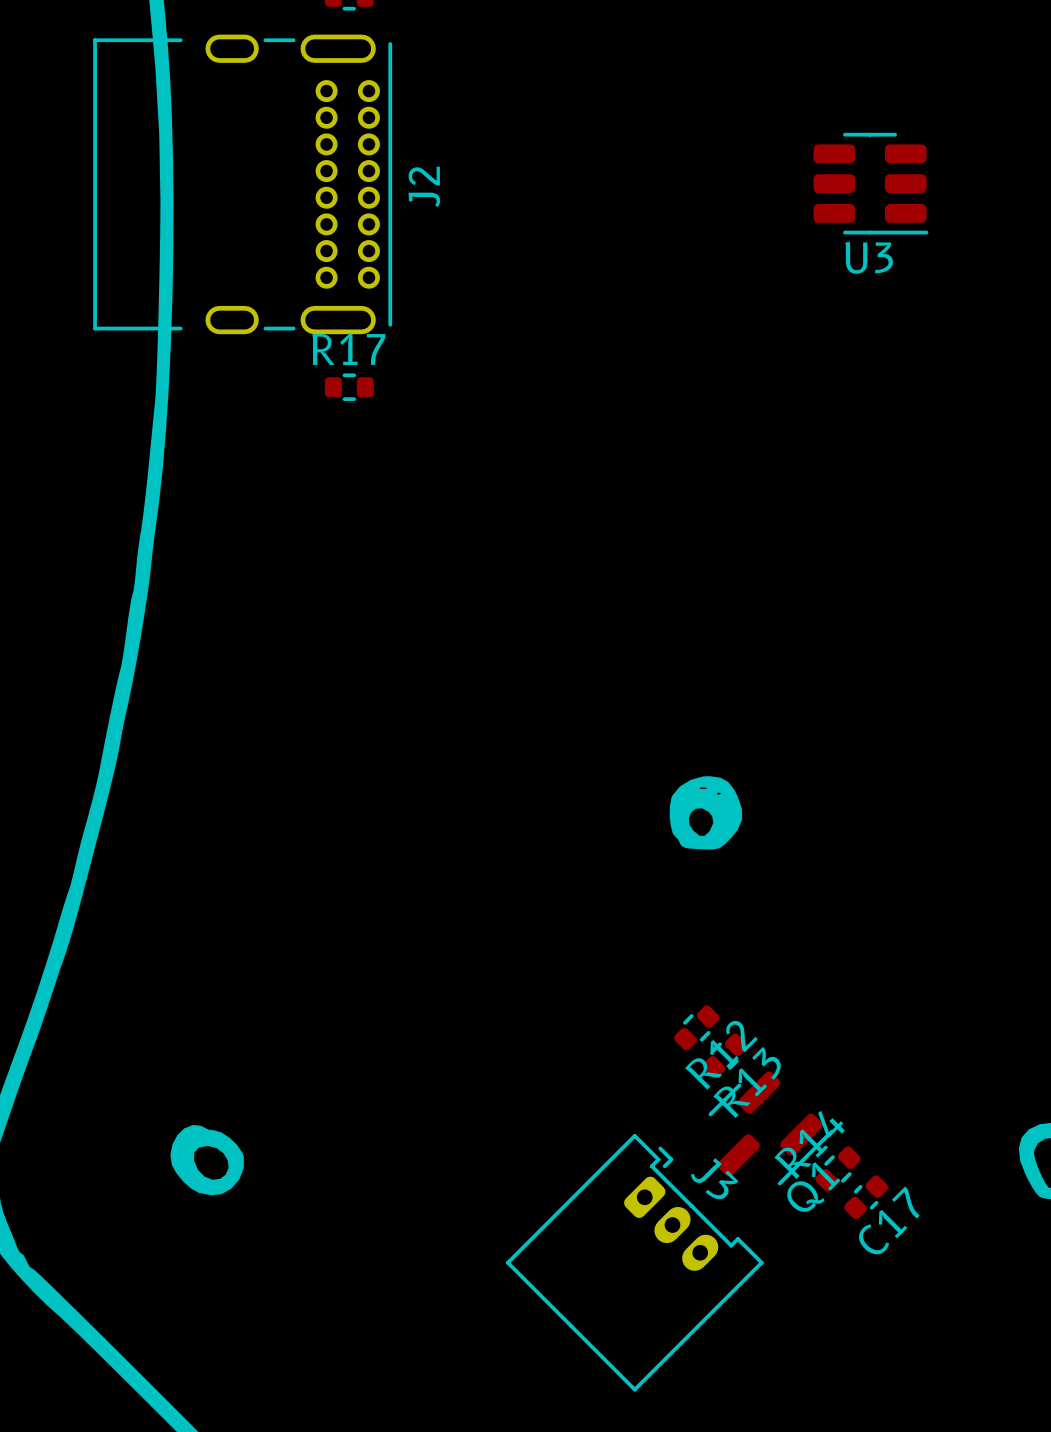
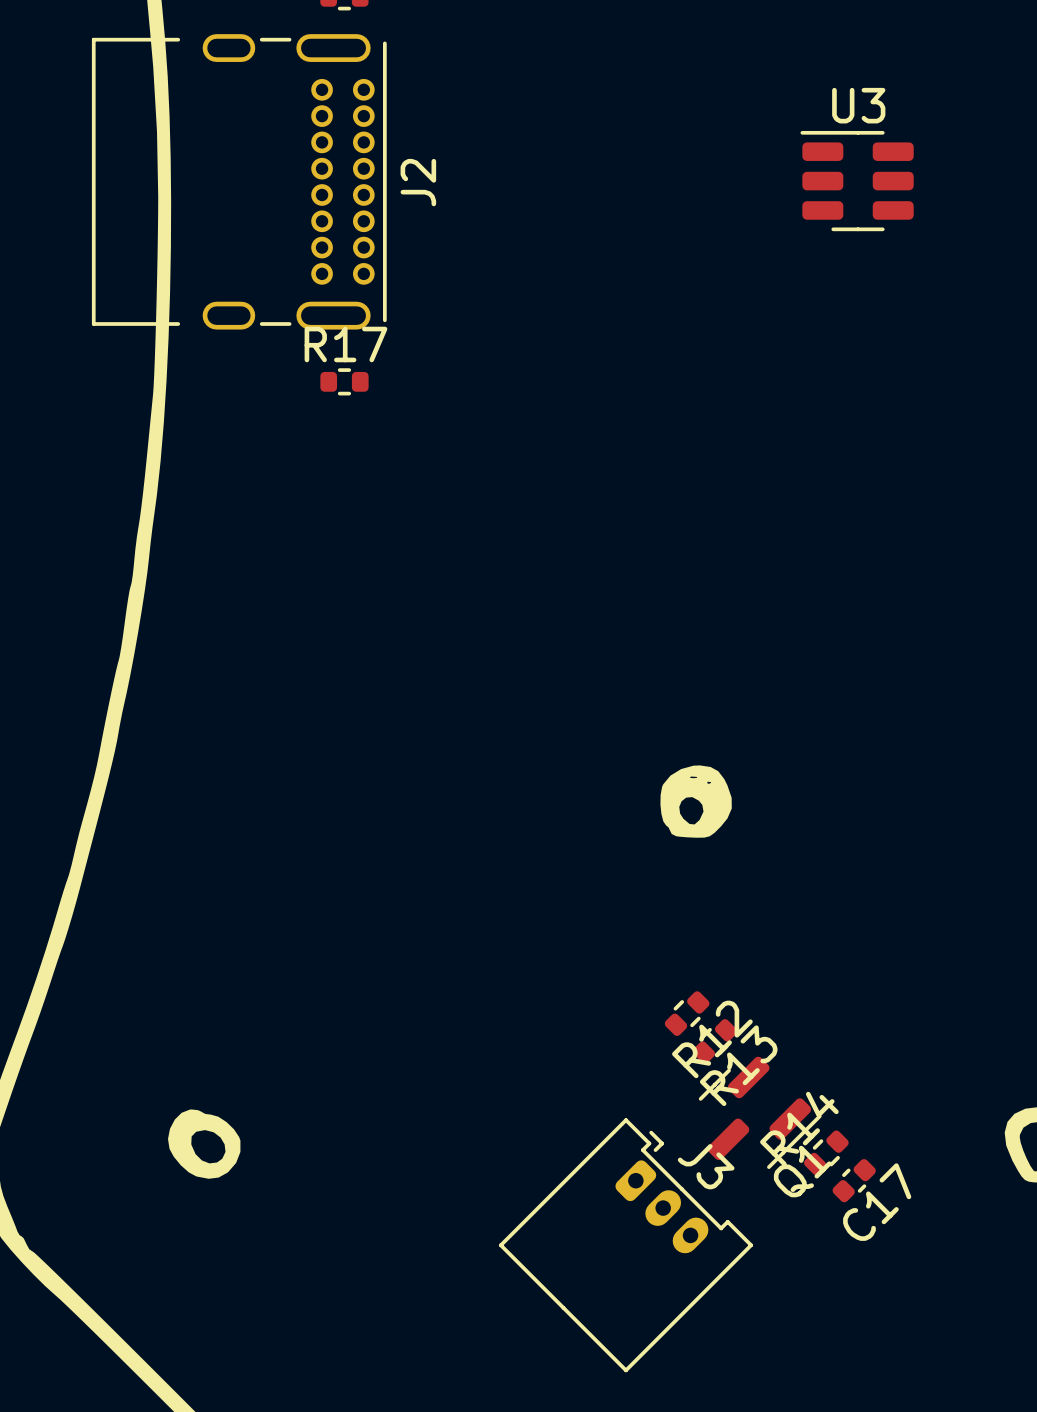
U3 rotation: 0° (871, 183) -> 180° (857, 181)

